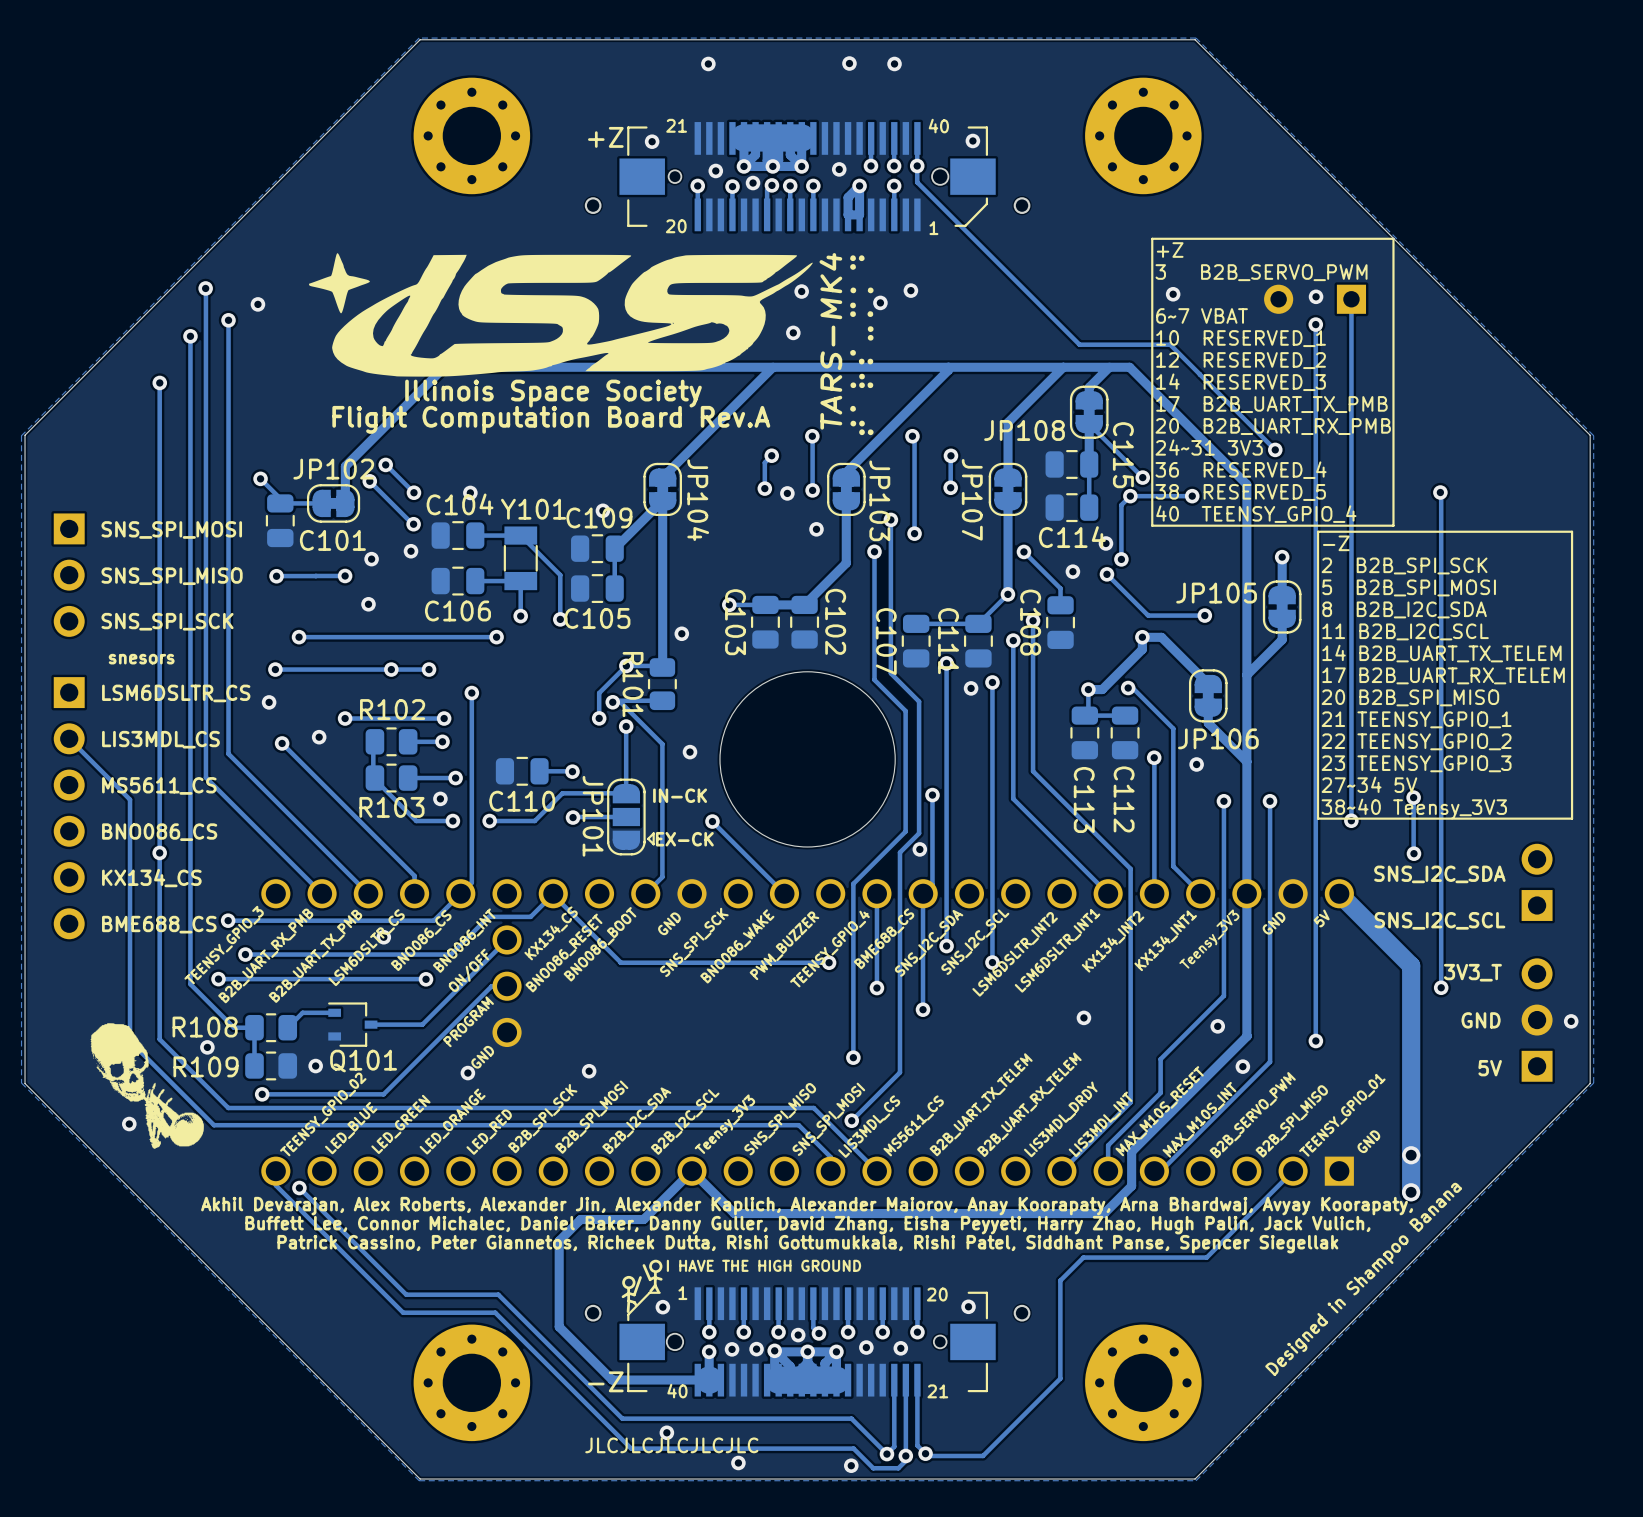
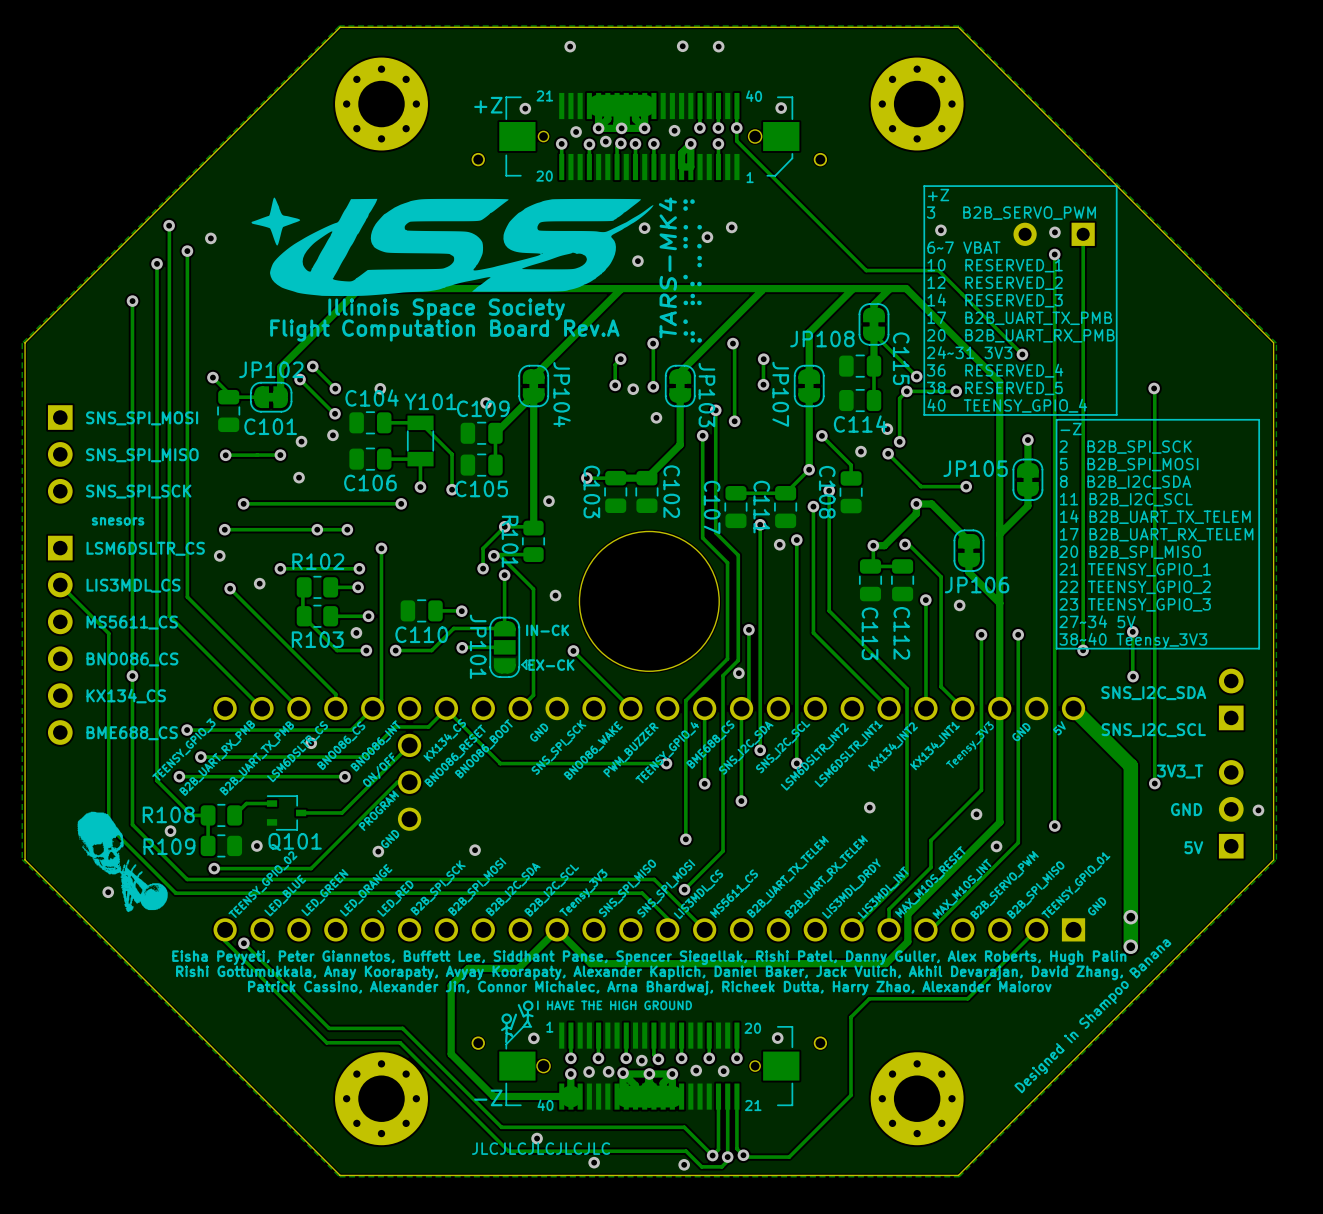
text: Akhil Devarajan, Alex Roberts, Alexander Jin, Alexander Kaplich, Alexander Maiorov, Anay Koorapaty, Arna Bhardwaj, Avyay Koorapaty, (807, 1206) -> Eisha Peyyeti, Peter Giannetos, Buffett Lee, Siddhant Panse, Spencer Siegellak, Rishi Patel, Danny Guller, Alex Roberts, Hugh Palin (649, 957)
text: Buffett Lee, Connor Michalec, Daniel Baker, Danny Guller, David Zhang, Eisha Peyyeti, Harry Zhao, Hugh Palin, Jack Vulich, (807, 1225) -> Rishi Gottumukkala, Anay Koorapaty, Avyay Koorapaty, Alexander Kaplich, Daniel Baker, Jack Vulich, Akhil Devarajan, David Zhang, (649, 972)
text: Patrick Cassino, Peter Giannetos, Richeek Dutta, Rishi Gottumukkala, Rishi Patel, Siddhant Panse, Spencer Siegellak (807, 1244) -> Patrick Cassino, Alexander Jin, Connor Michalec, Arna Bhardwaj, Richeek Dutta, Harry Zhao, Alexander Maiorov (649, 988)

